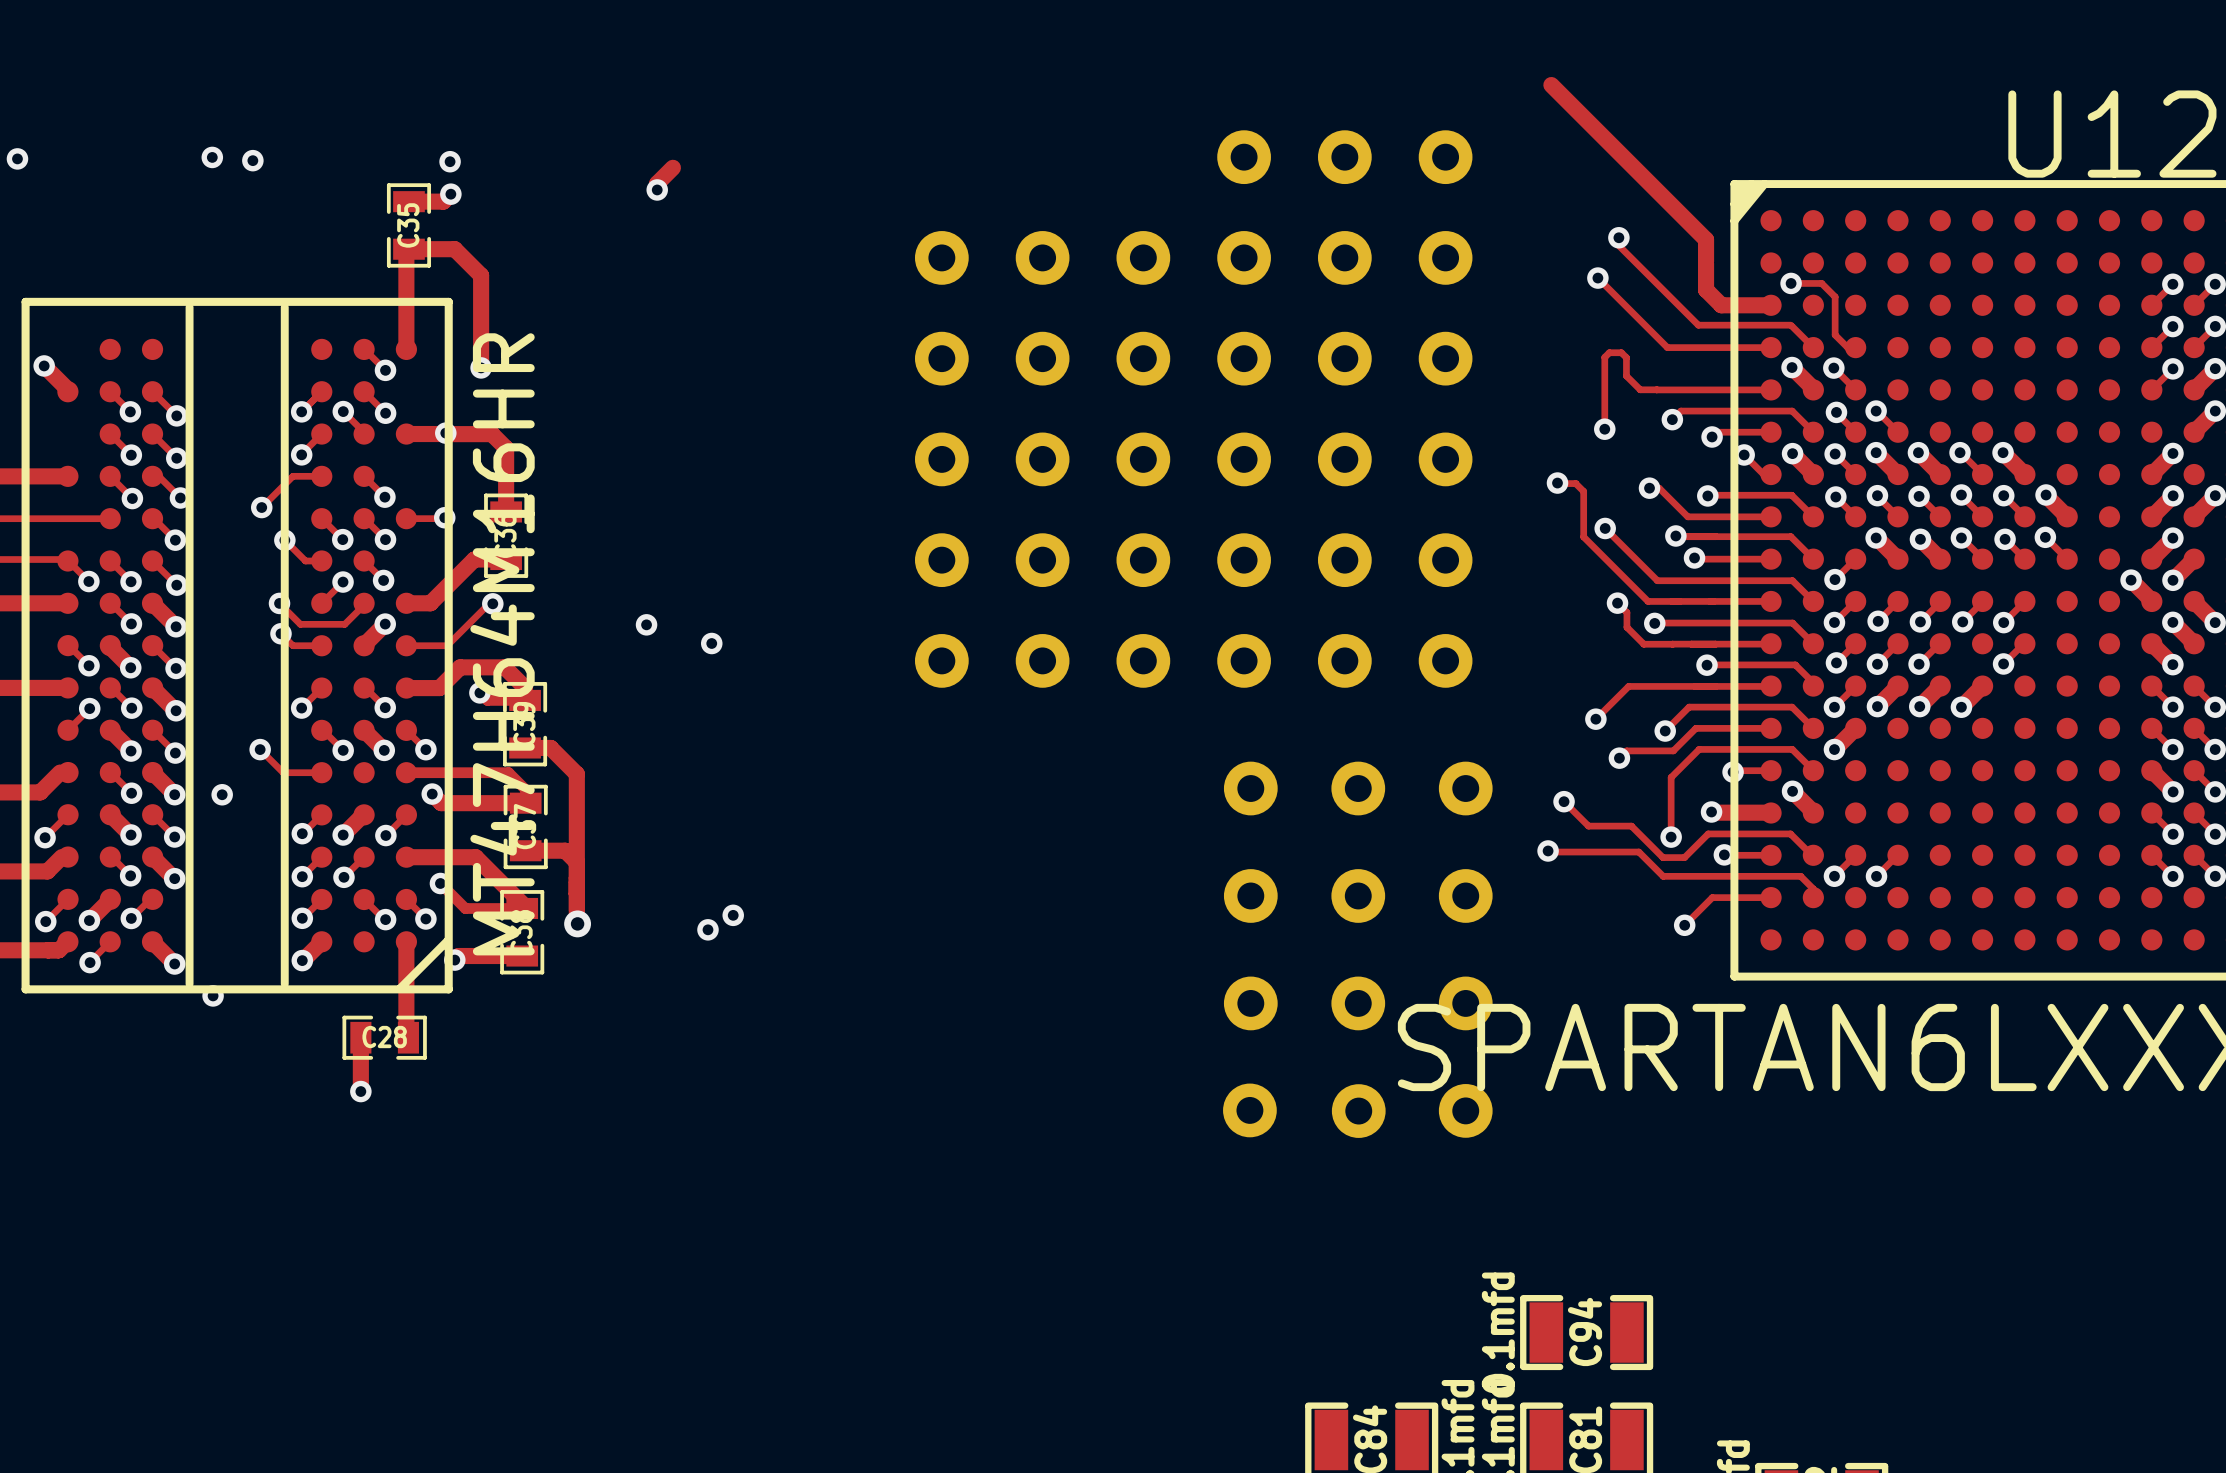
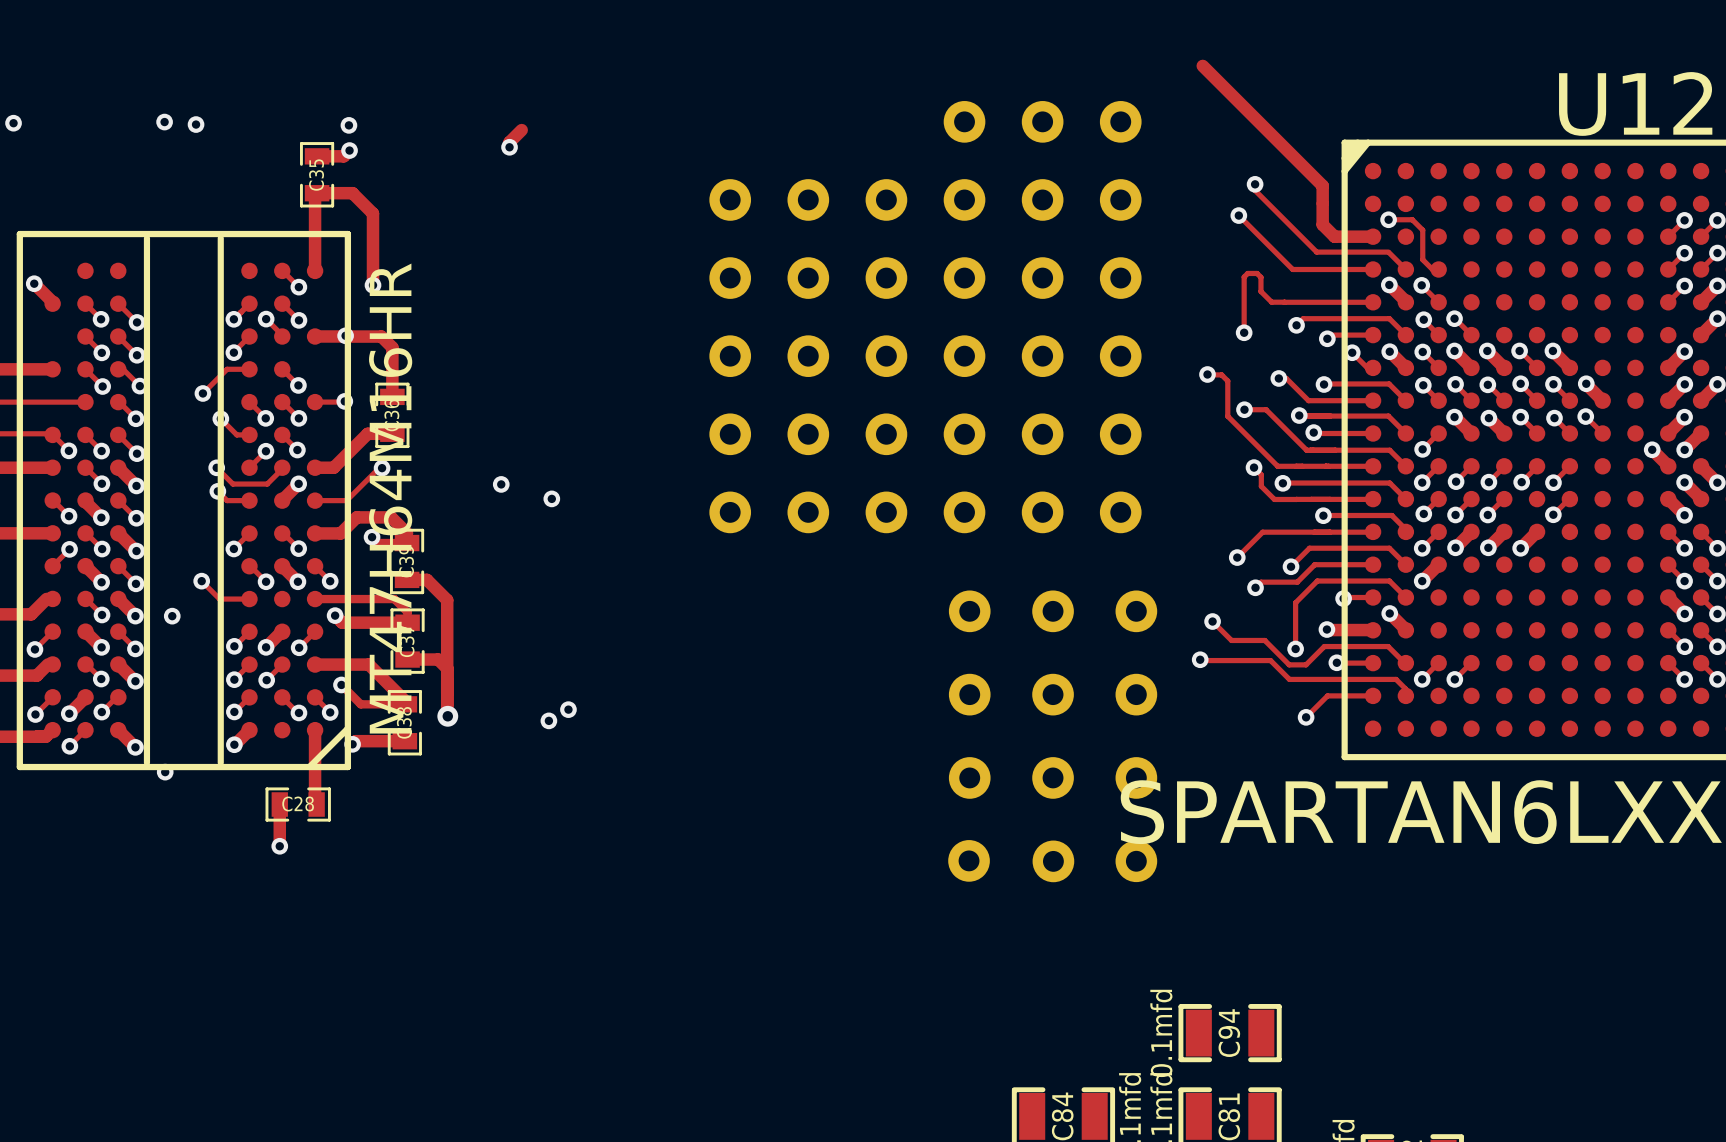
track: (1605, 528) (1657, 580) (1685, 580) -> (1244, 409) (1266, 409) (1306, 450)

